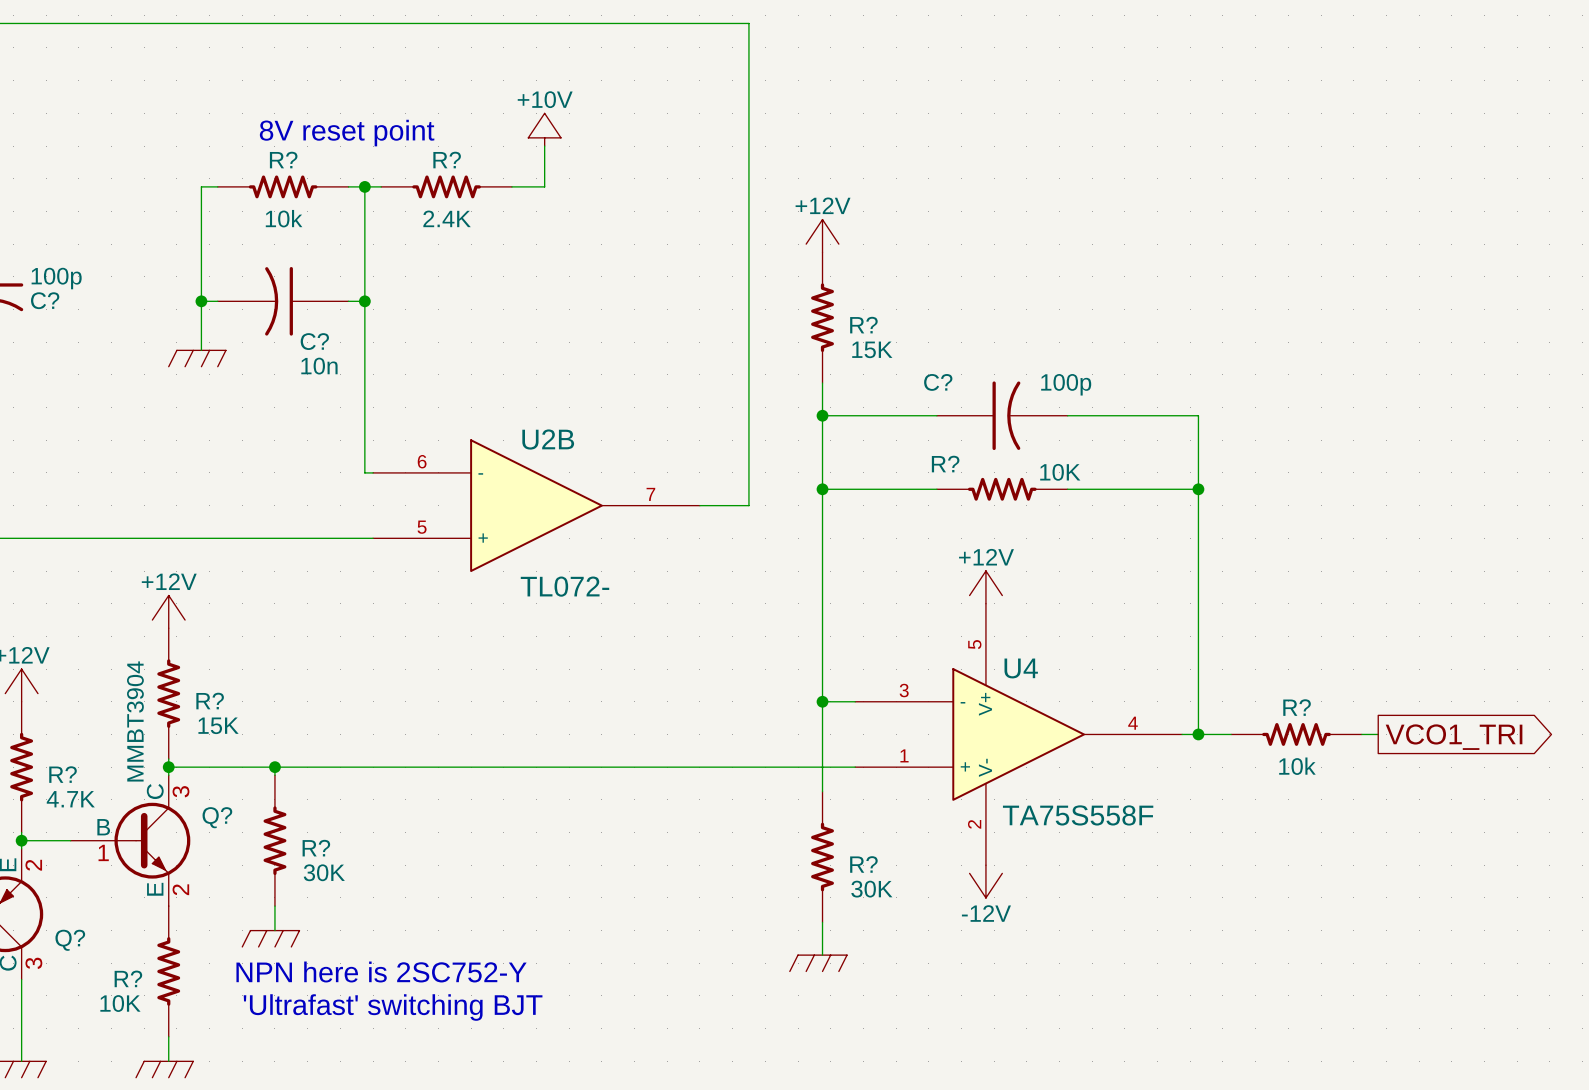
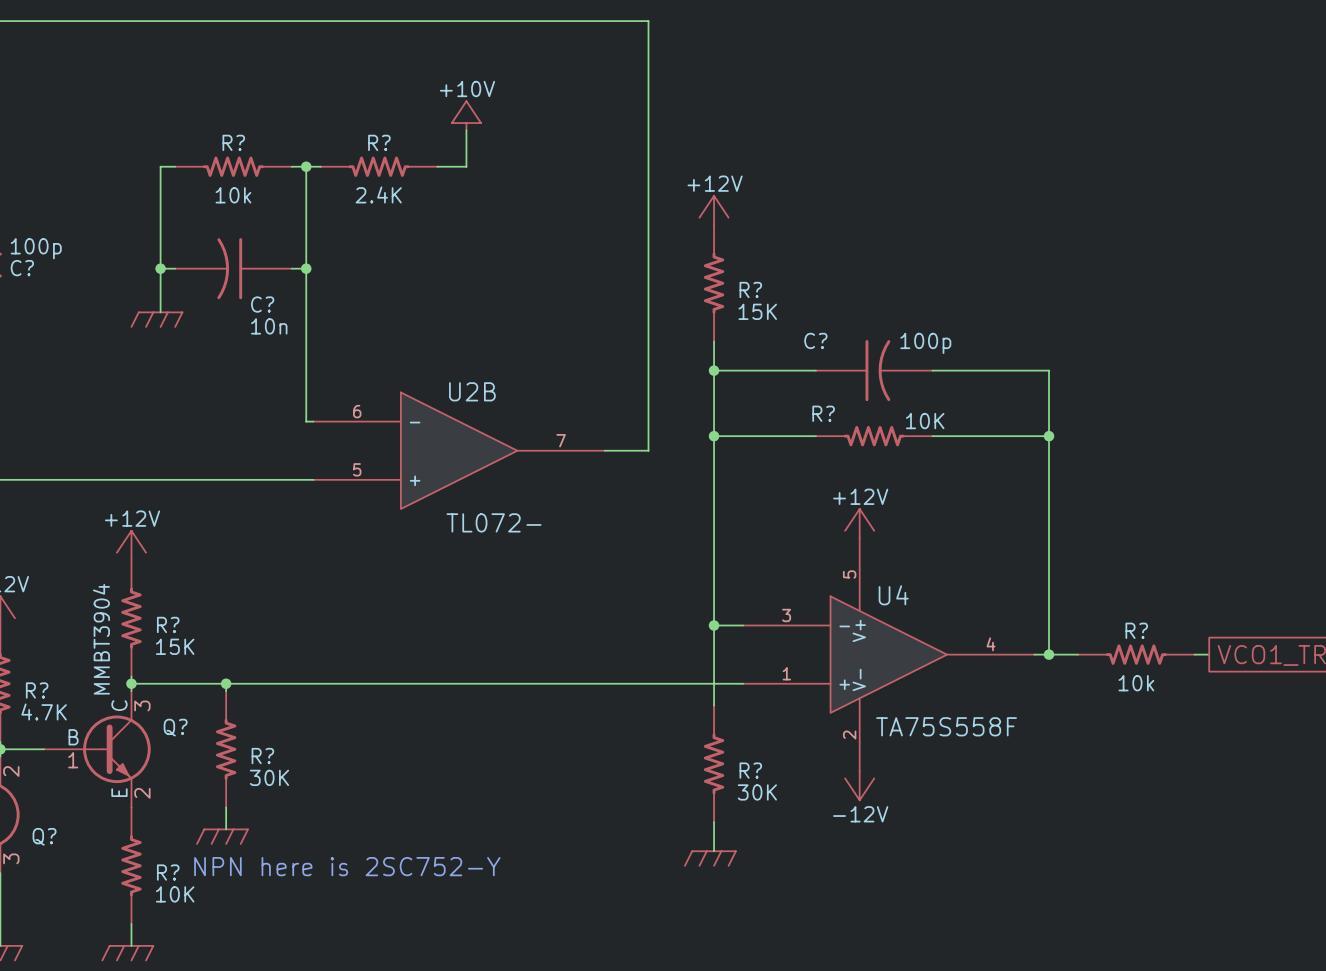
text: 8V reset point (347, 133) -> none
R? rotation: 0° (168, 971) -> 180° (131, 865)
R? value position: 10K (120, 1003) -> 10K (175, 894)
text: 'Ultrafast' switching BJT (393, 1007) -> none

